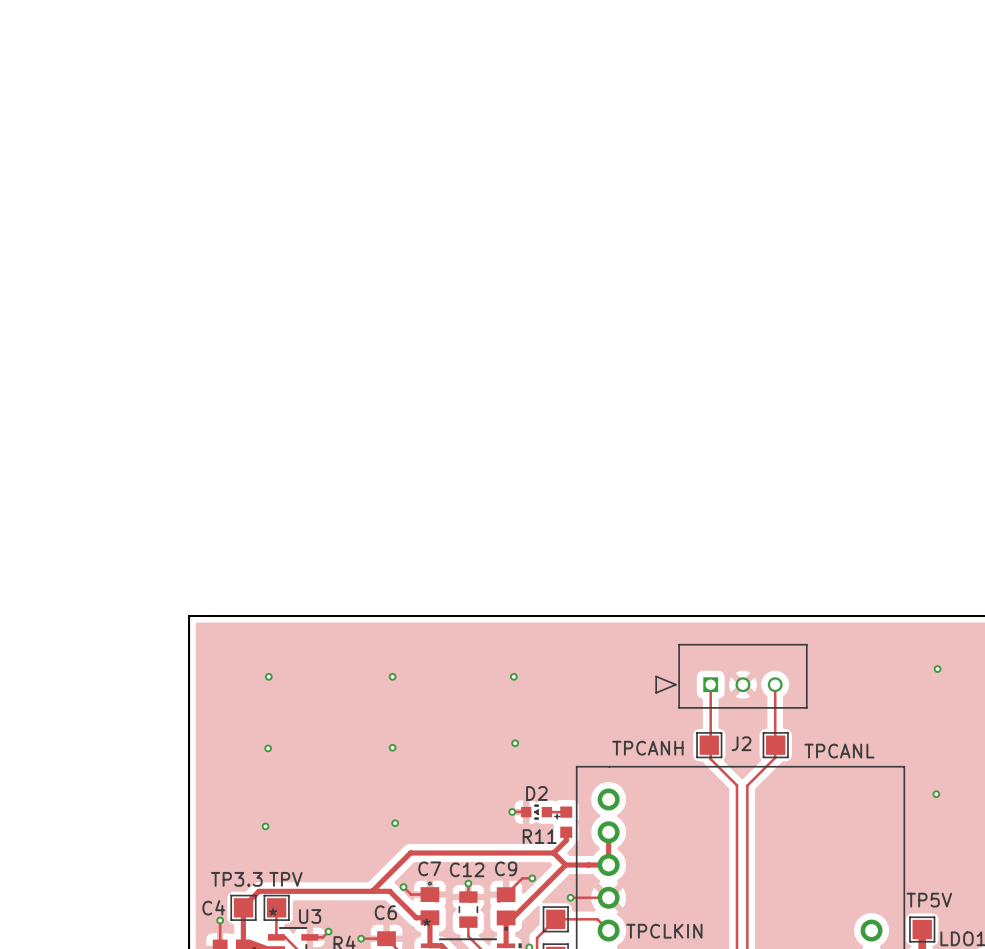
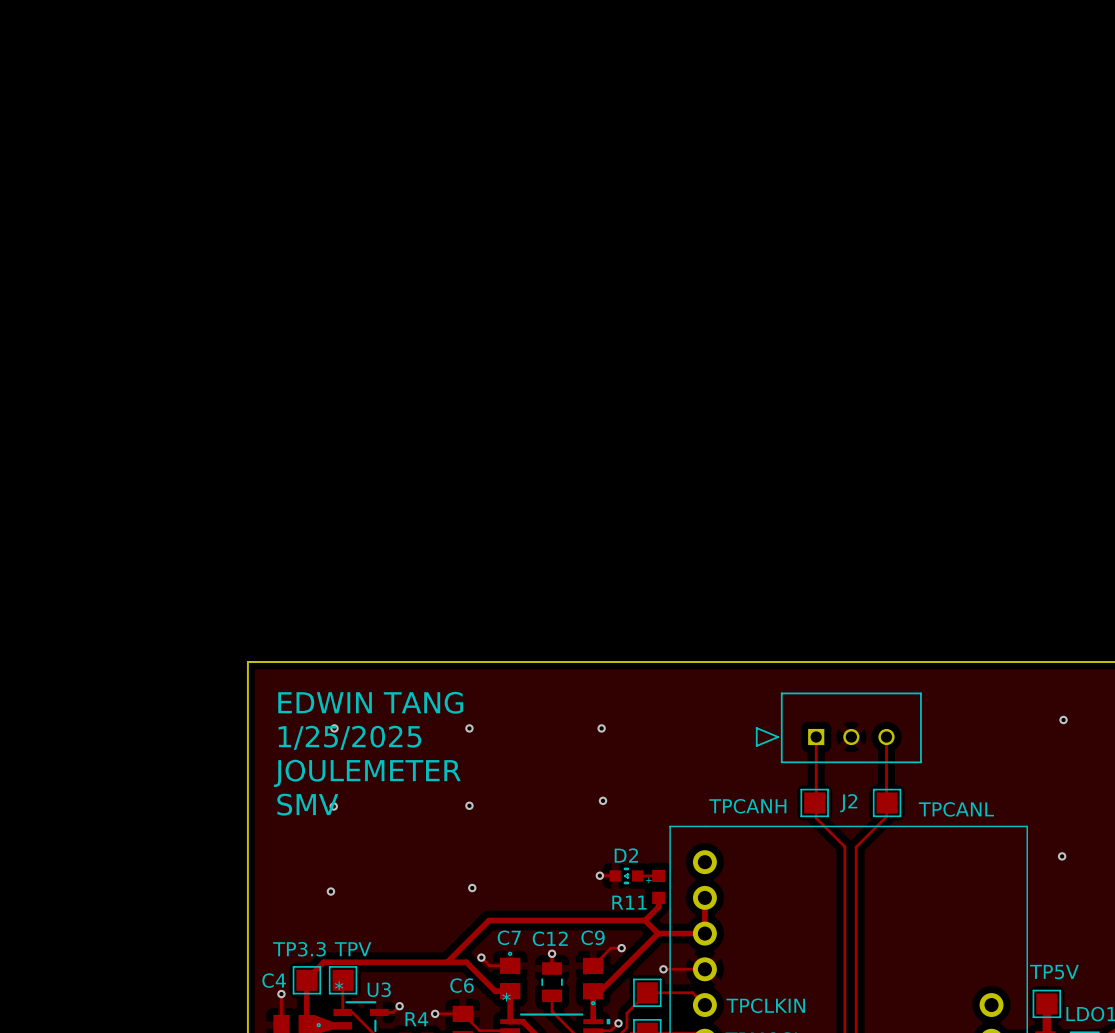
text: none -> EDWIN TANG (370, 702)
text: none -> 1/25/2025 (349, 737)
text: none -> JOULEMETER (367, 773)
text: none -> SMV (307, 804)

